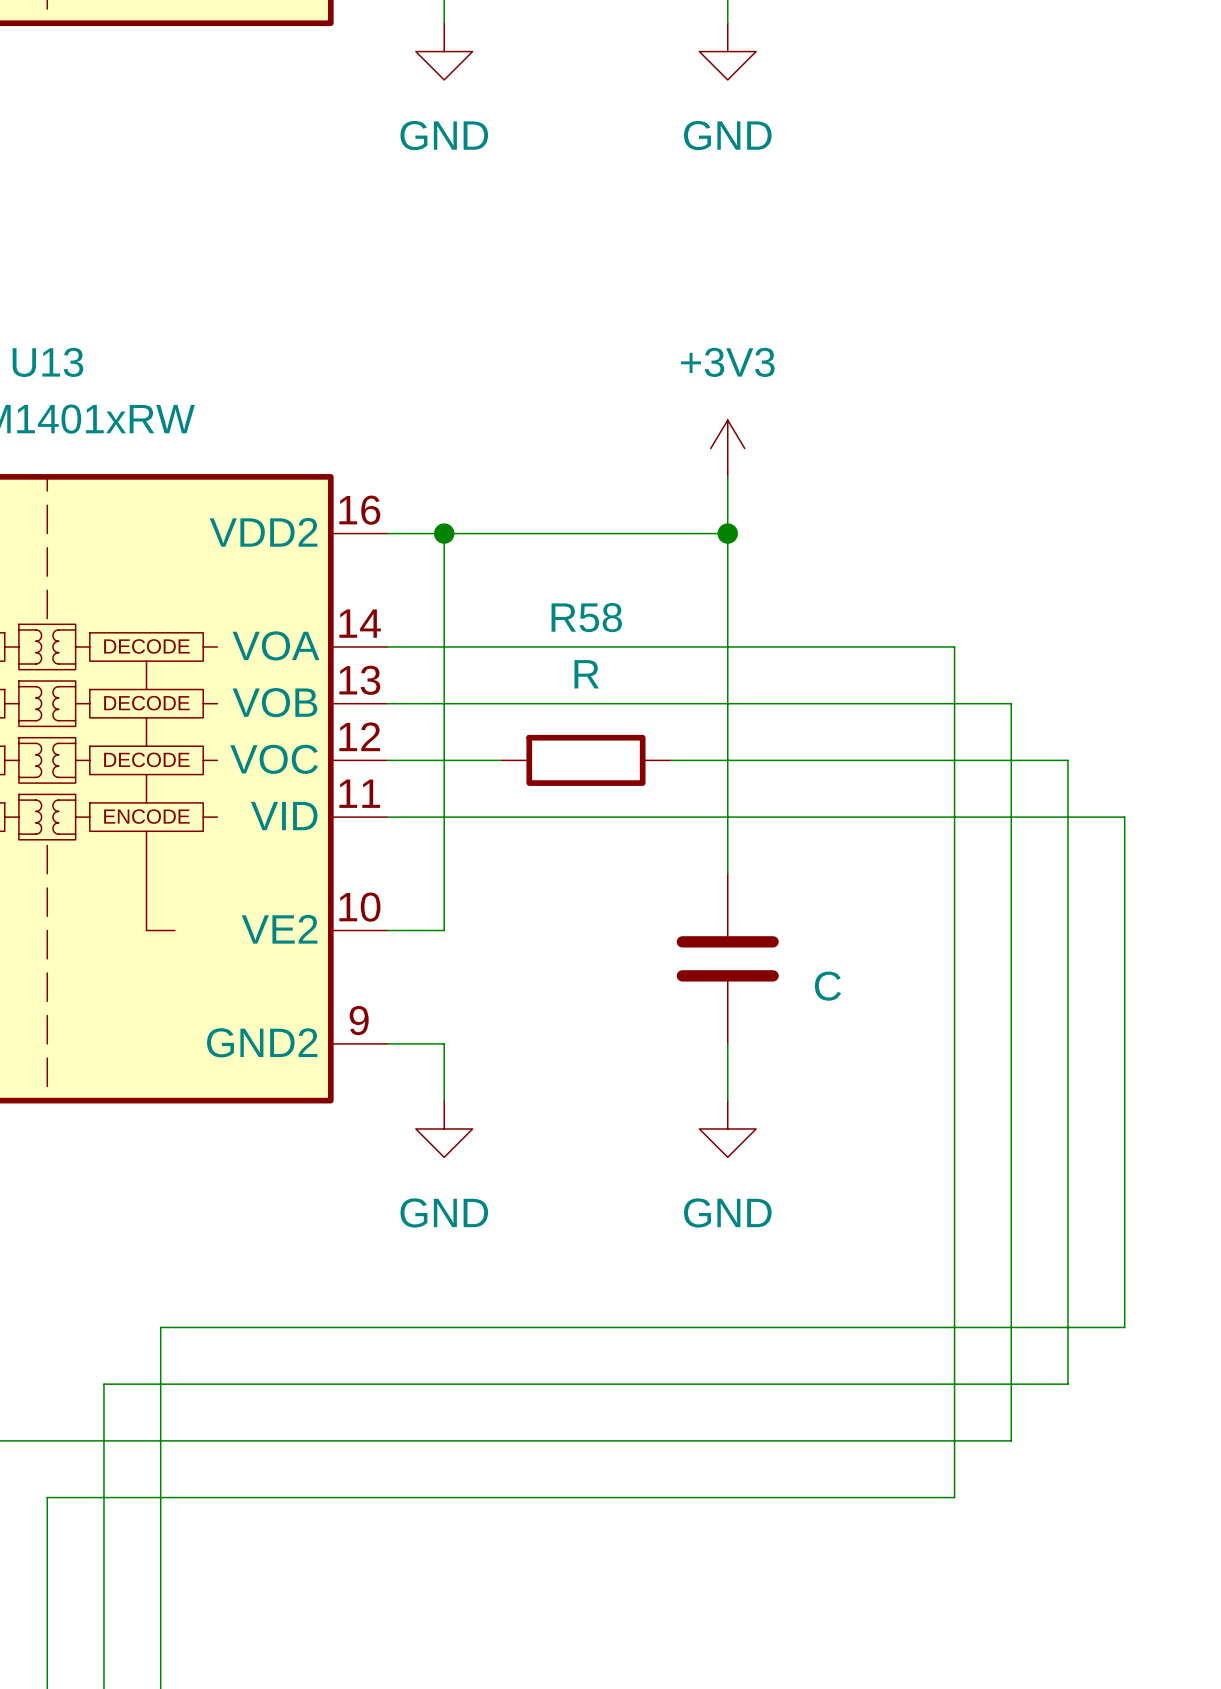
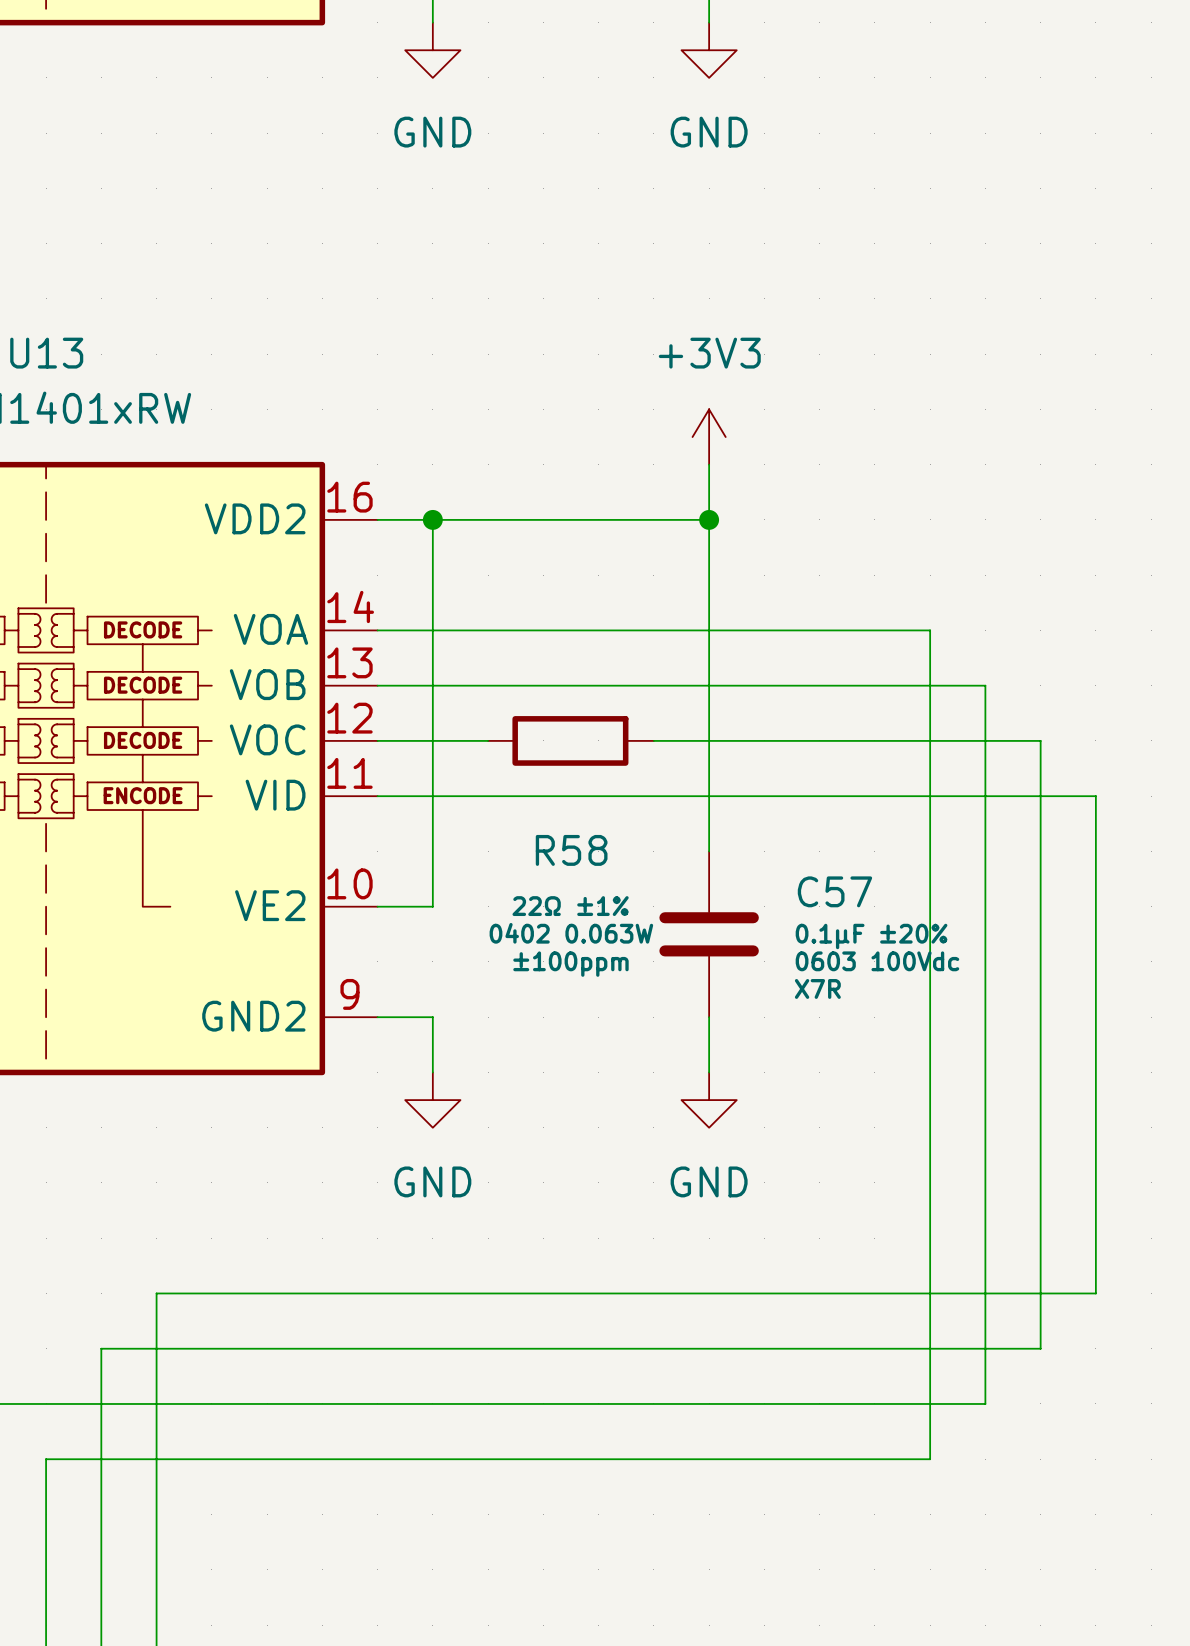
R58 name position: R58 (586, 617) -> R58 (571, 850)
R58 value: R (586, 674) -> none
C57 name: none -> C57 (834, 891)
R58 text: none -> 22Ω ±1% (570, 906)
R58 text: none -> 0402 0.063W (571, 933)
C57 text: none -> 0.1μF ±20% (871, 936)
C57 value: C (827, 986) -> none
C57 text: none -> 0603 100Vdc (877, 961)
R58 text: none -> ±100ppm (570, 964)
C57 text: none -> X7R (817, 988)

